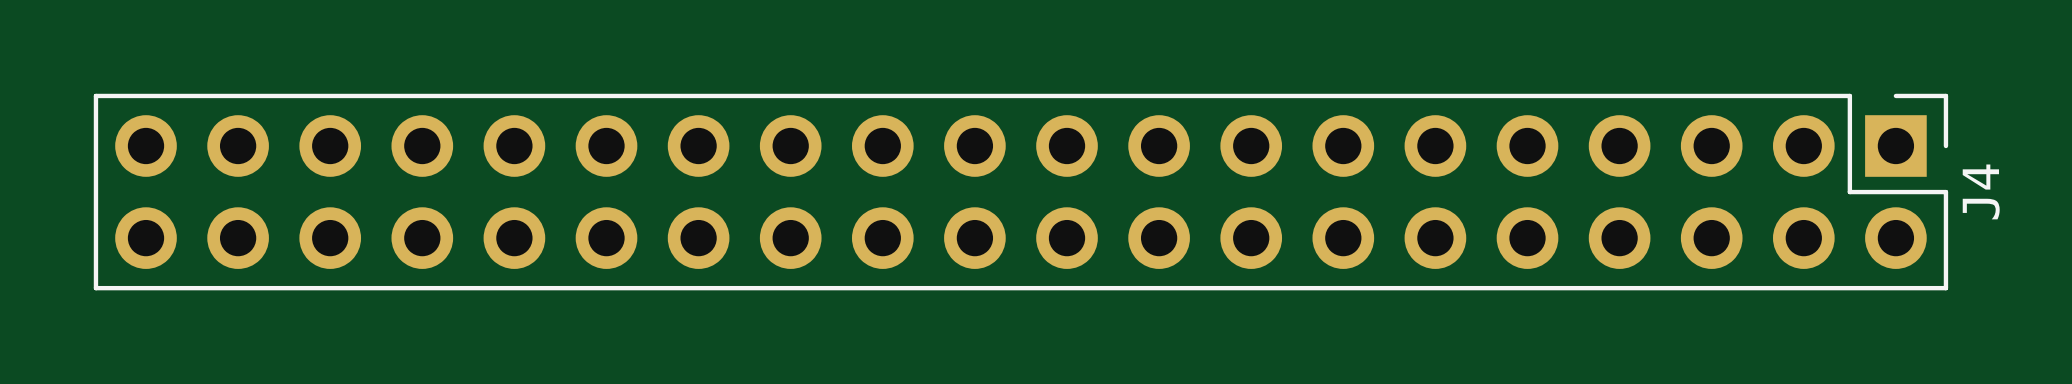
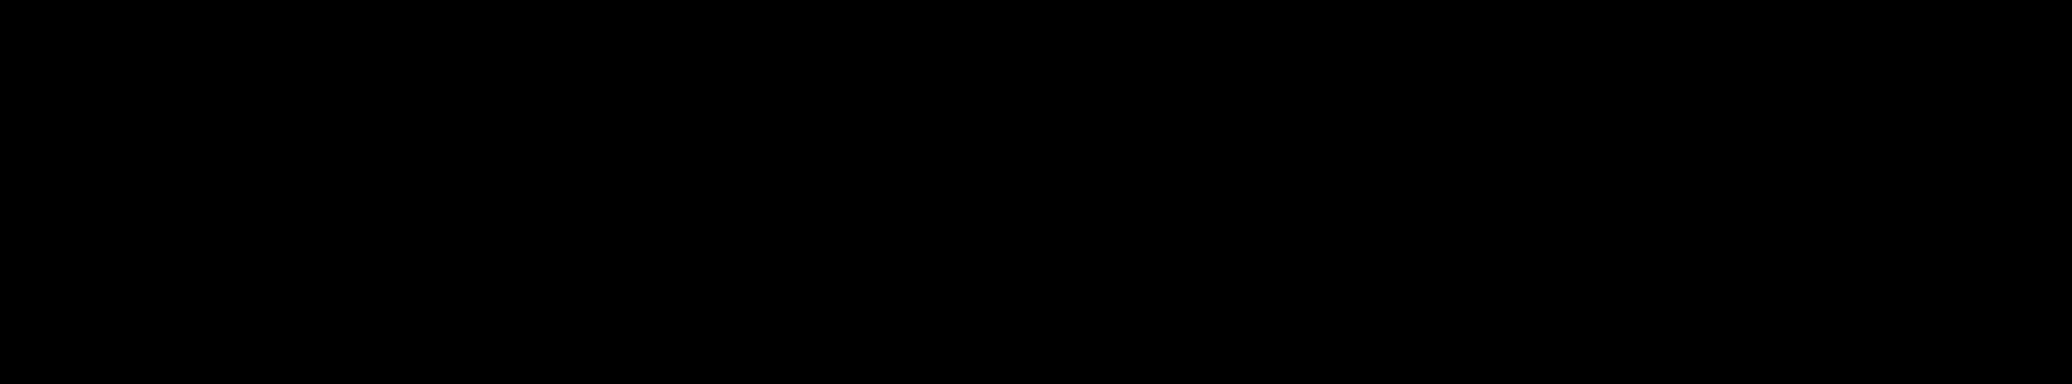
J4: (1020, 192) -> none

